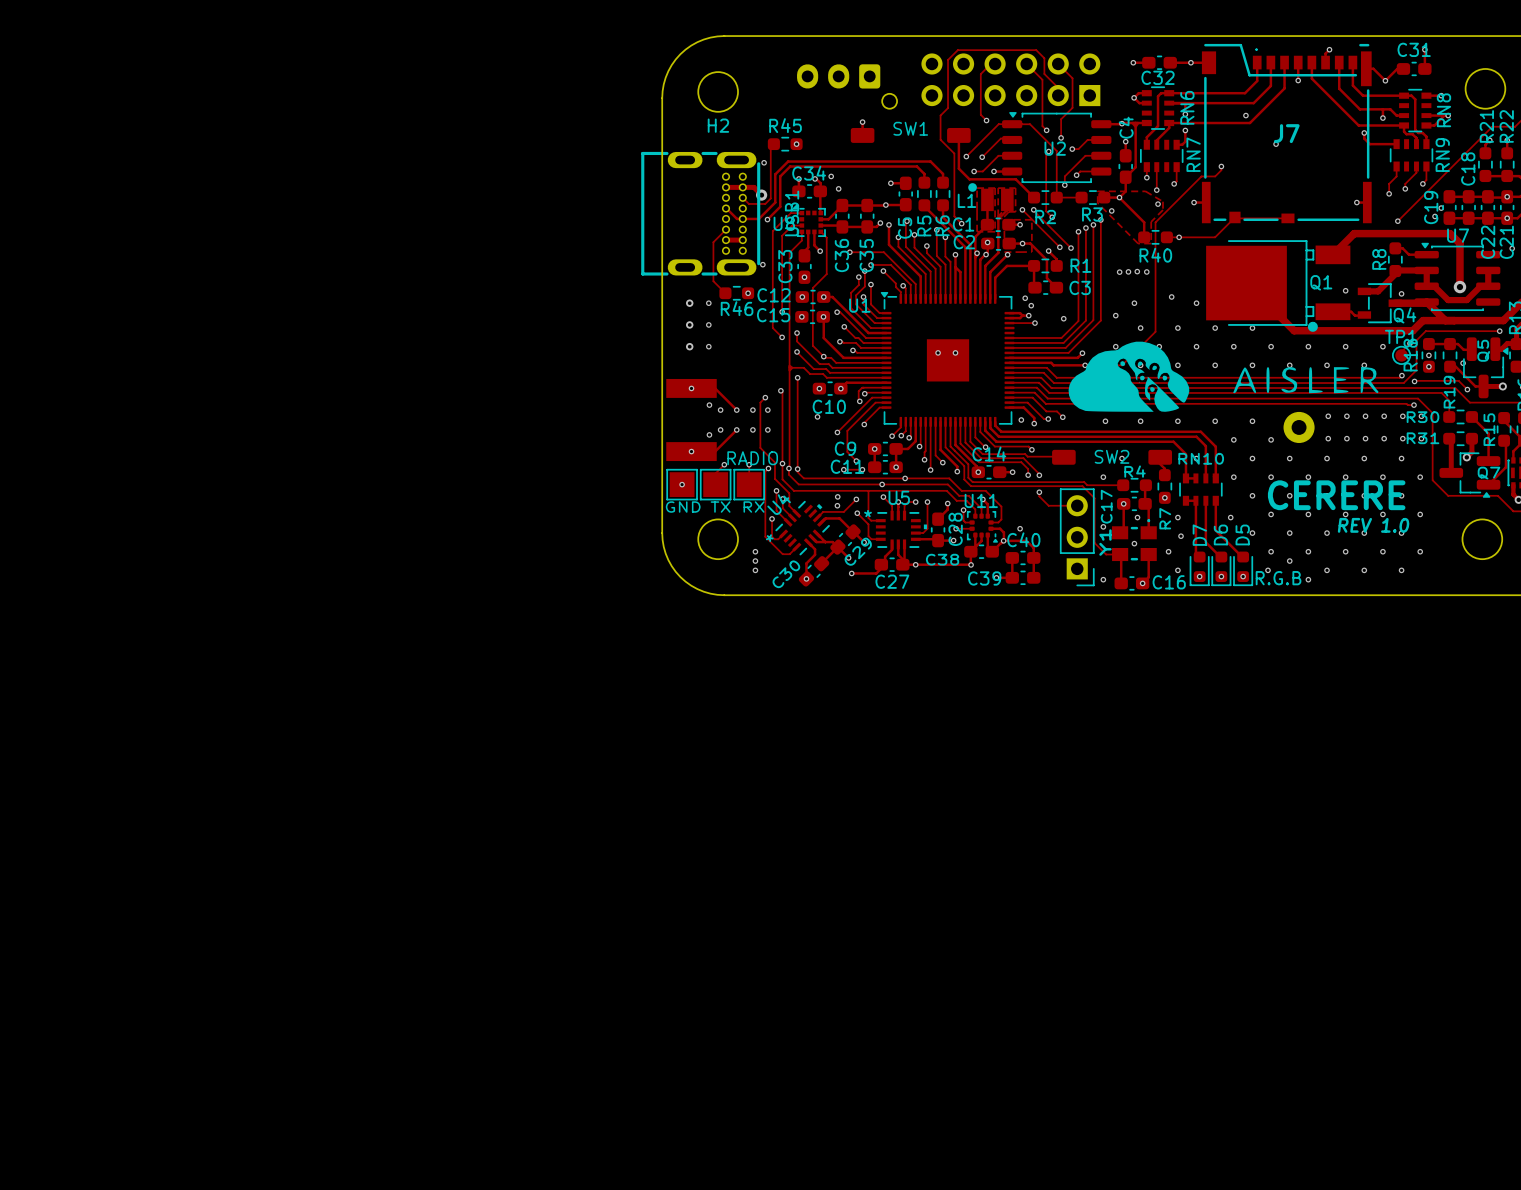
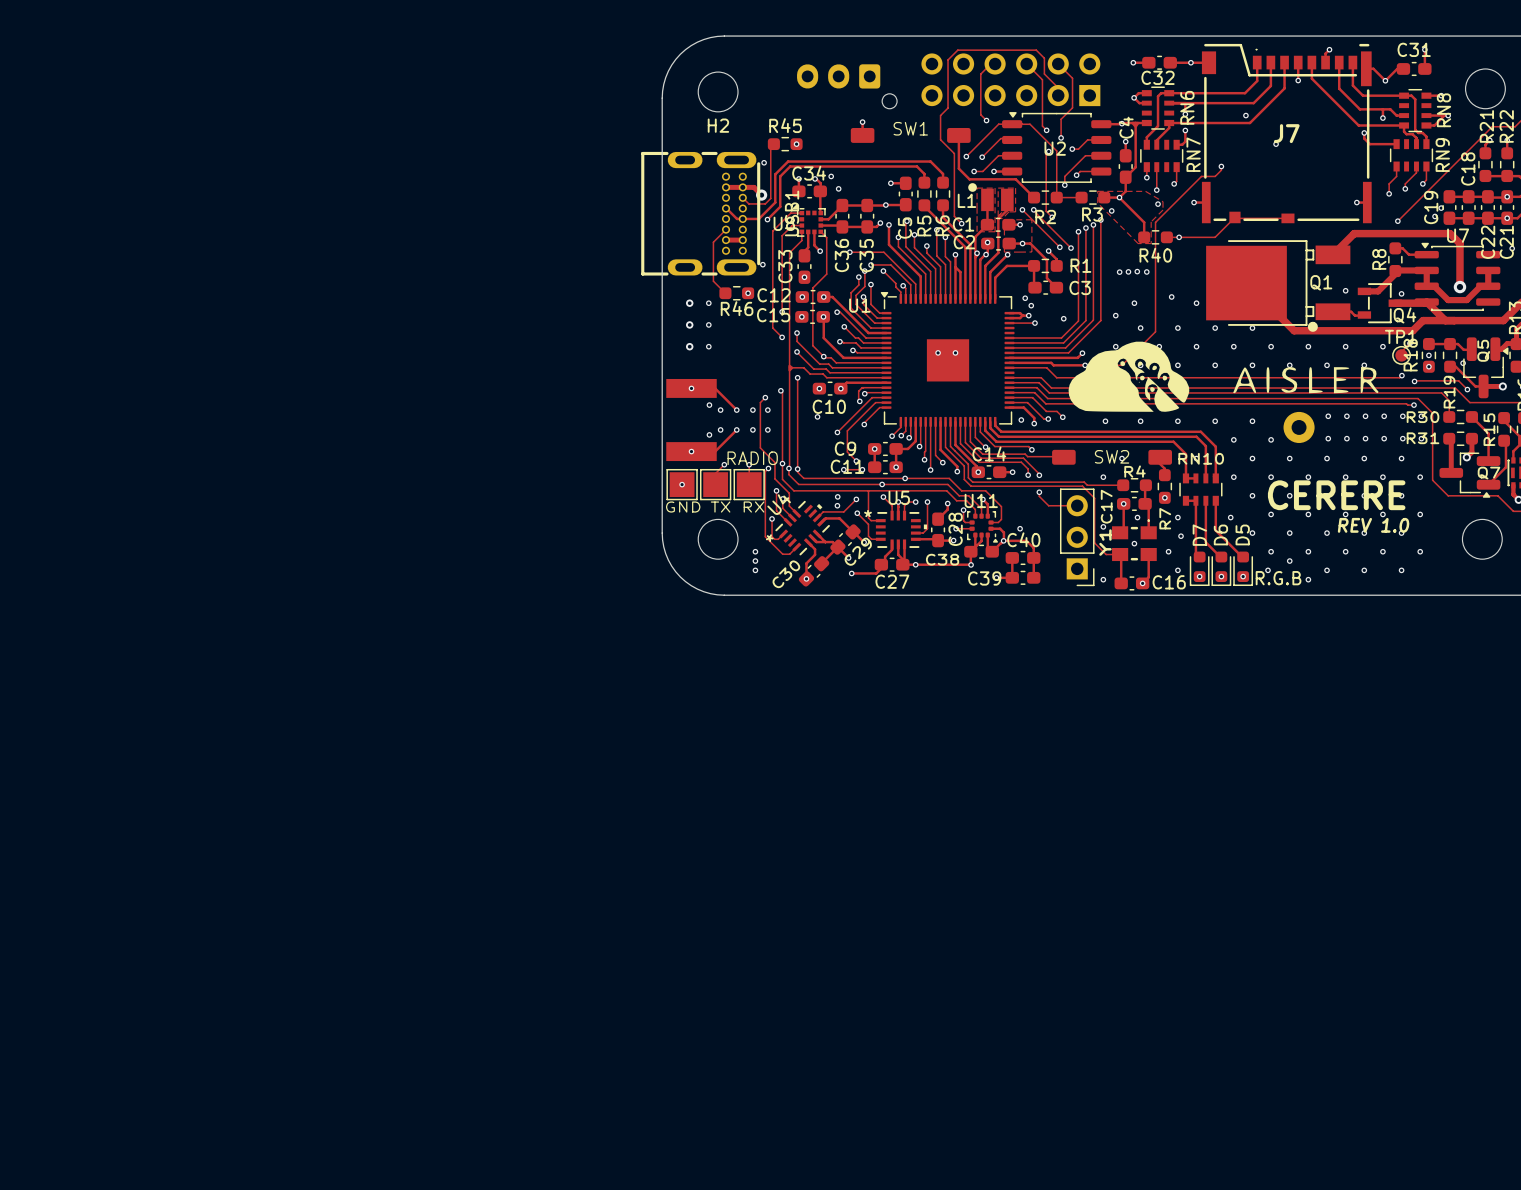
track: (1499, 331) (1425, 331) (1416, 340) (1416, 370) (1403, 383) (1053, 383) (1043, 372) (1009, 372) -> none
via: (1499, 331) -> none

